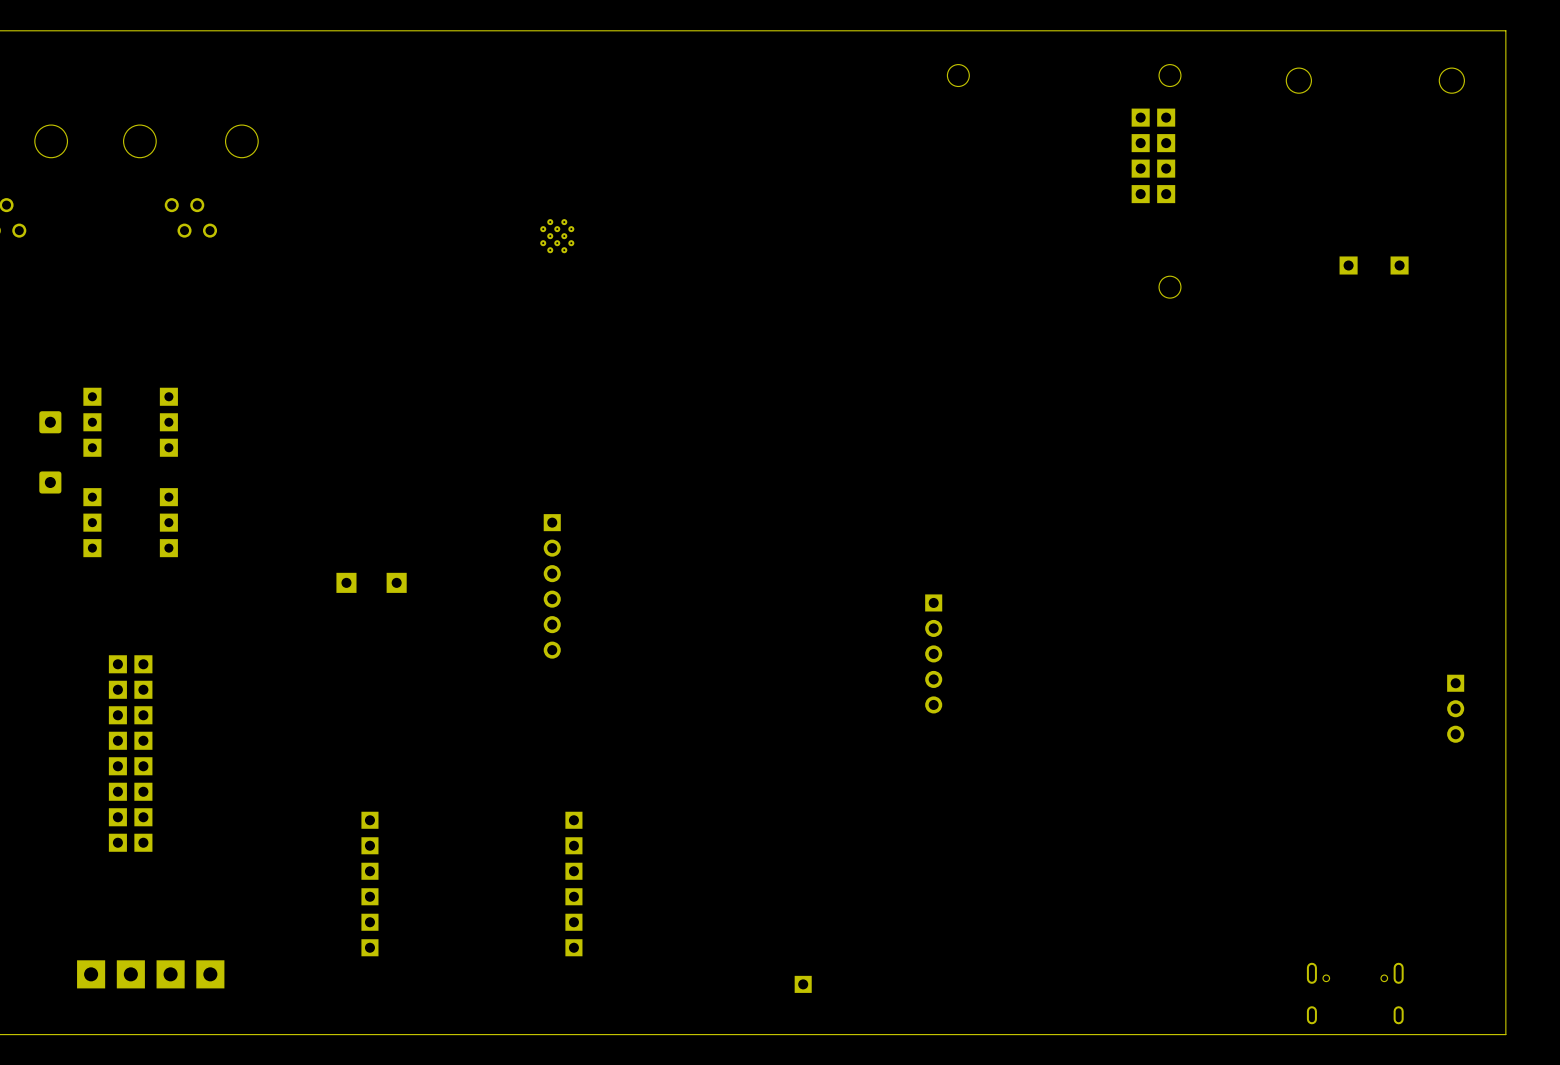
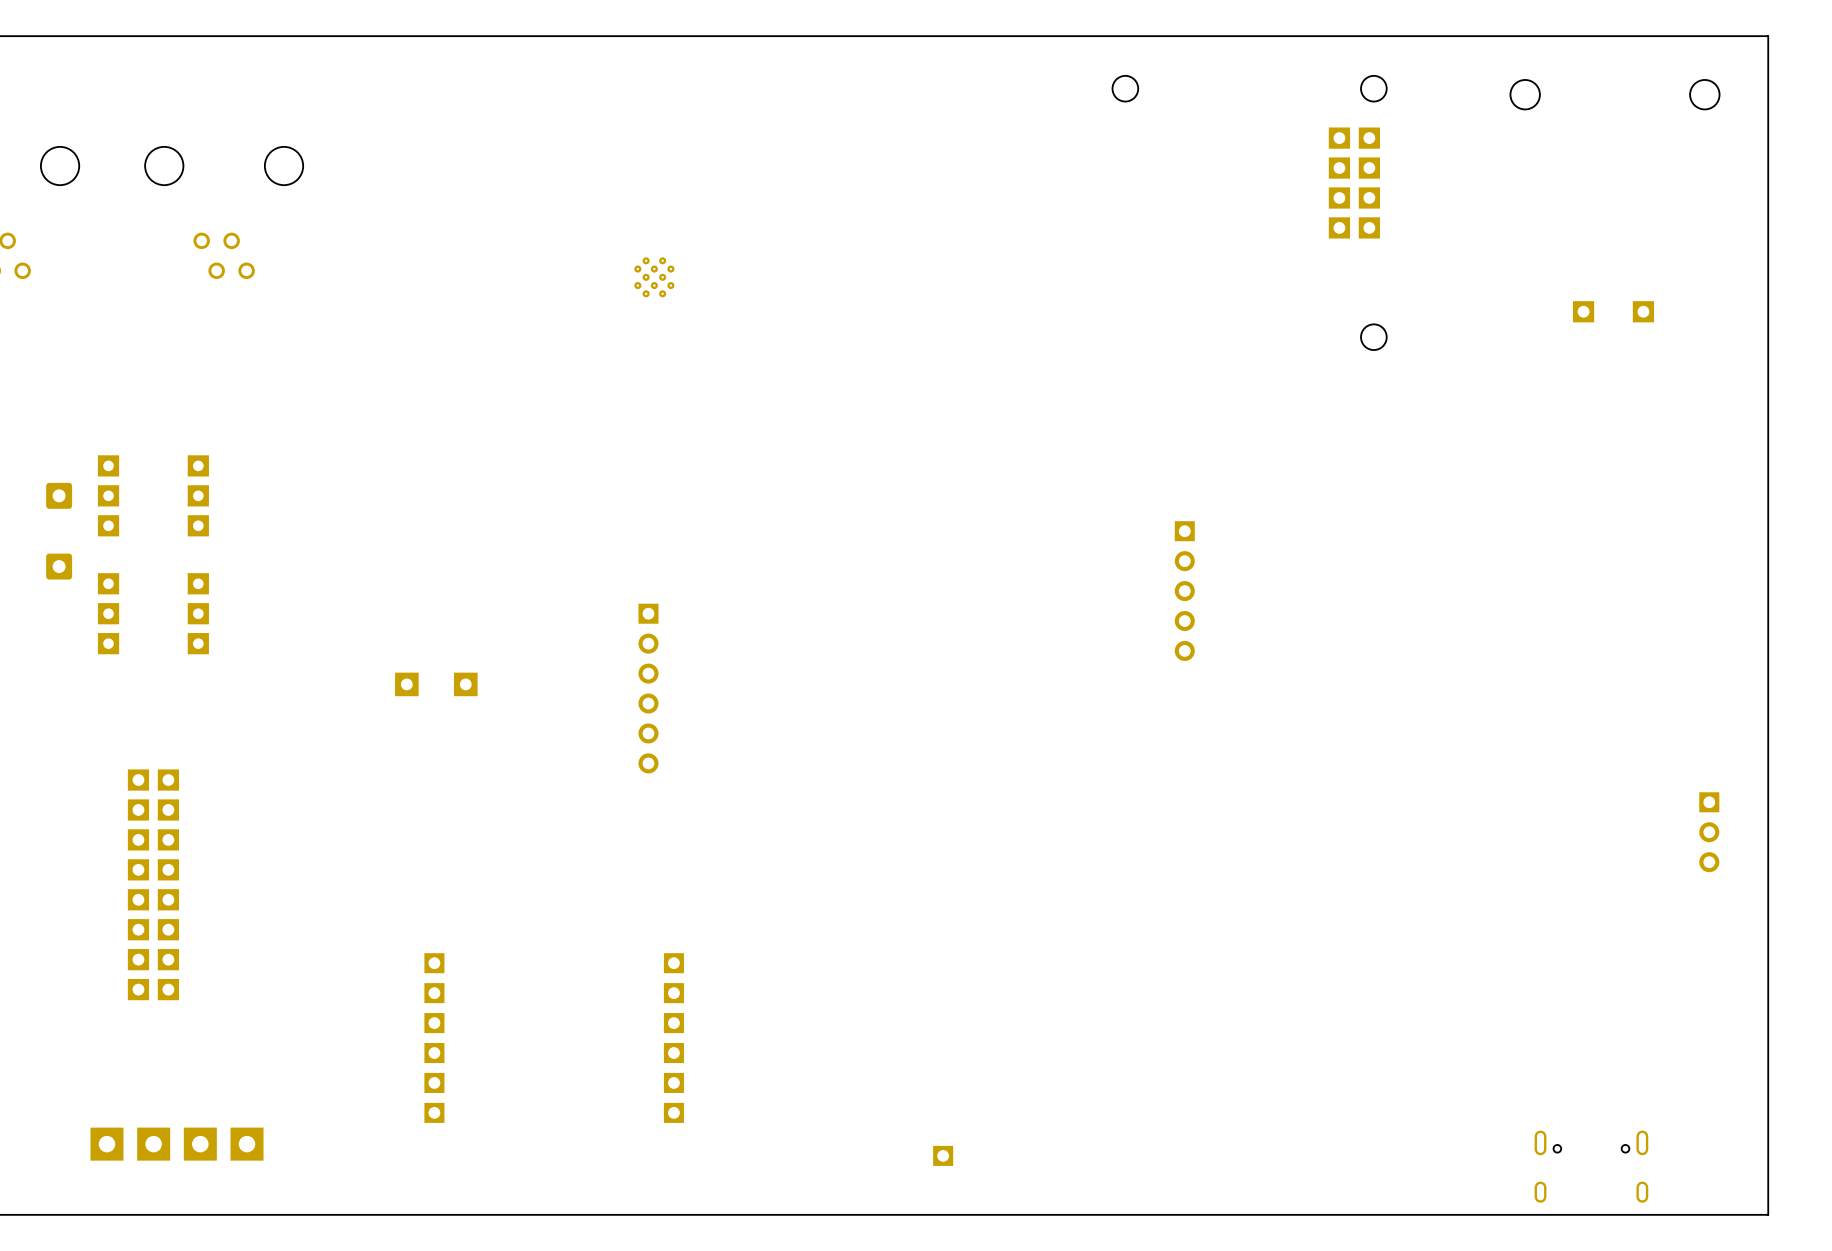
part position: (933, 653) -> (1184, 591)

